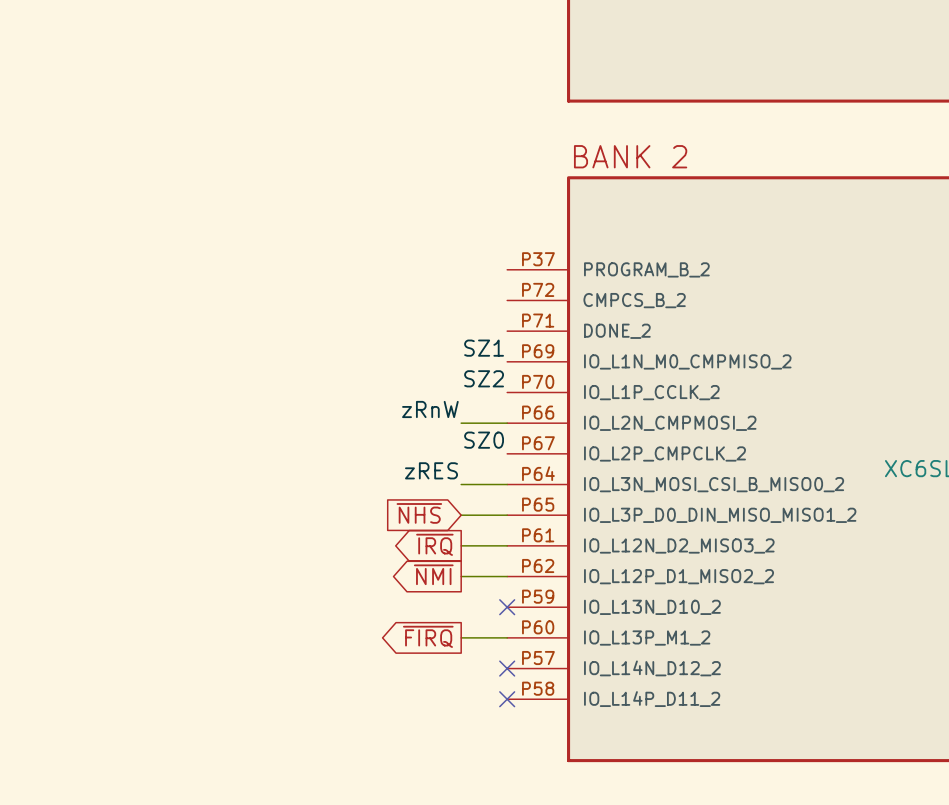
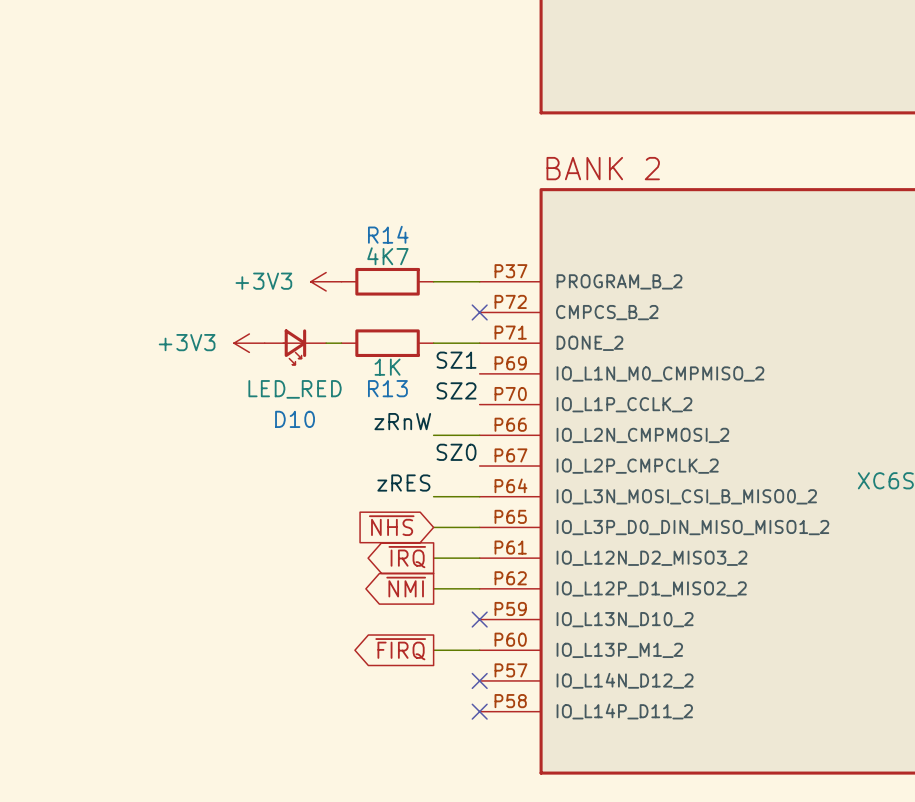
power symbol: none -> +3V3 (326, 281)
R14: none -> 4K7 (387, 281)
wire: none -> (433, 281) (479, 281)
no-connect mark: none -> (479, 312)
power symbol: none -> +3V3 (249, 343)
wire: none -> (326, 343) (341, 343)
R13: none -> 1K (387, 343)
wire: none -> (433, 343) (479, 343)
D10: none -> LED_RED (295, 347)

